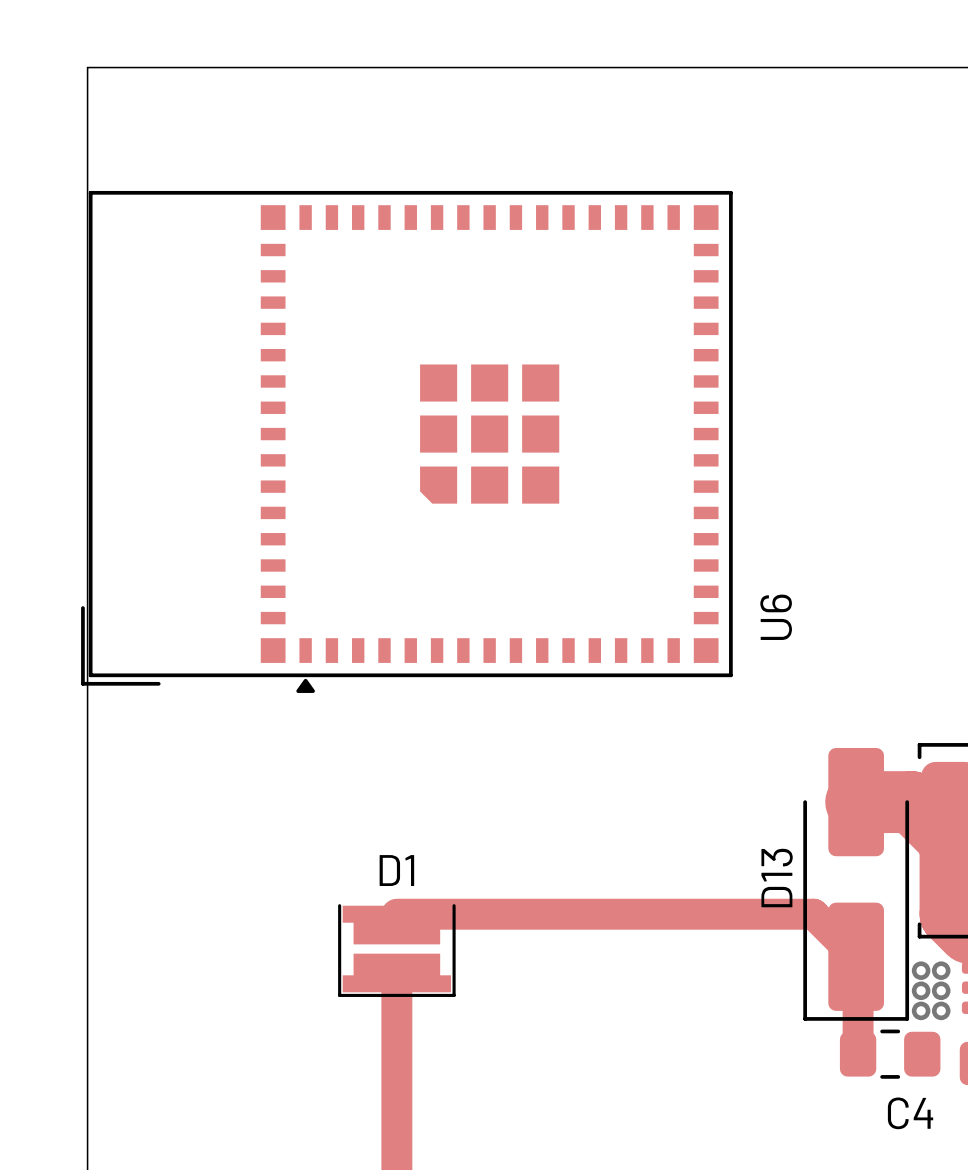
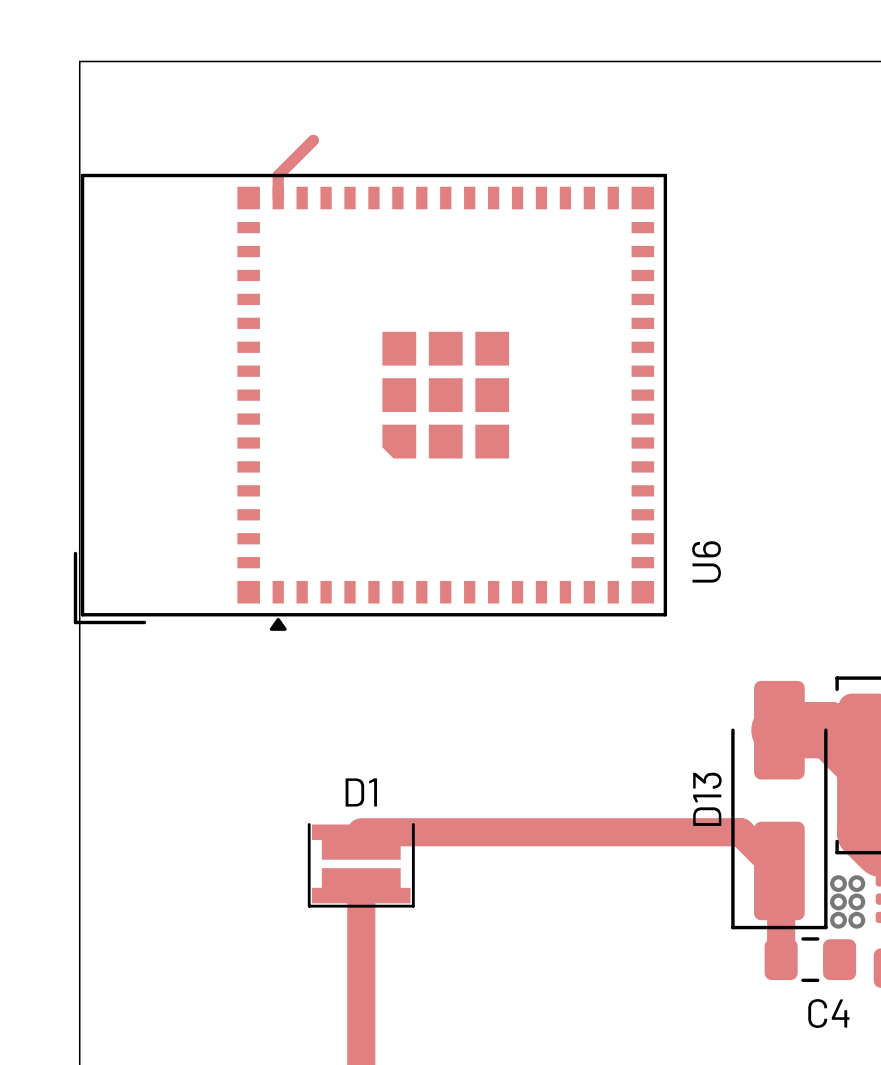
track: none -> (313, 140) (278, 175) (278, 198)

